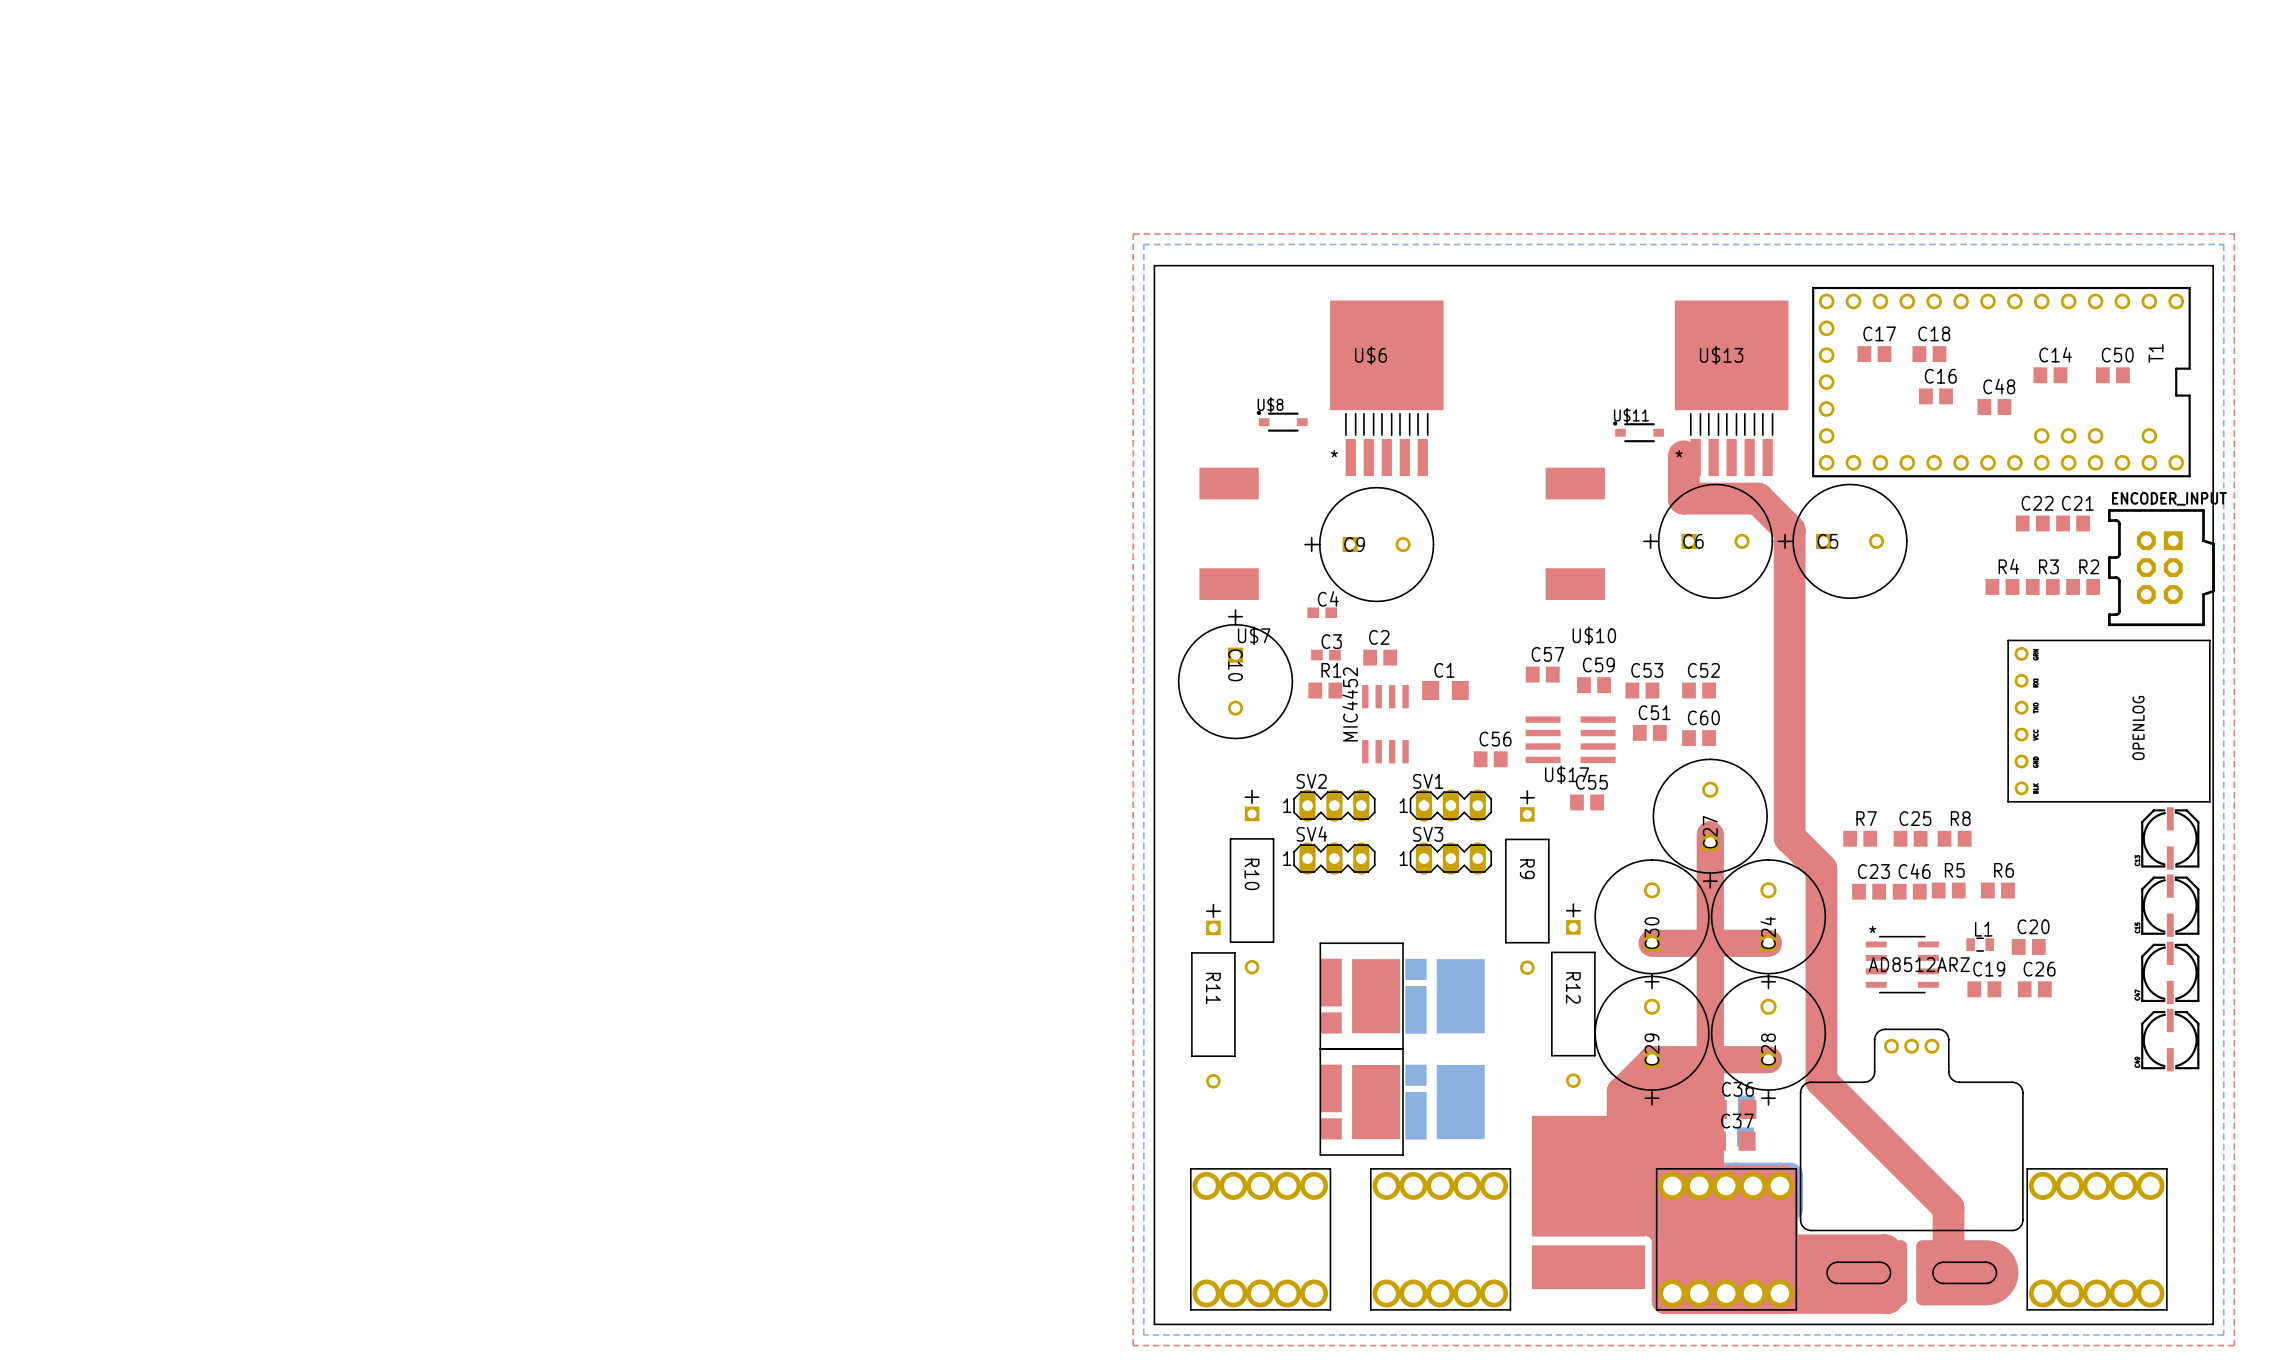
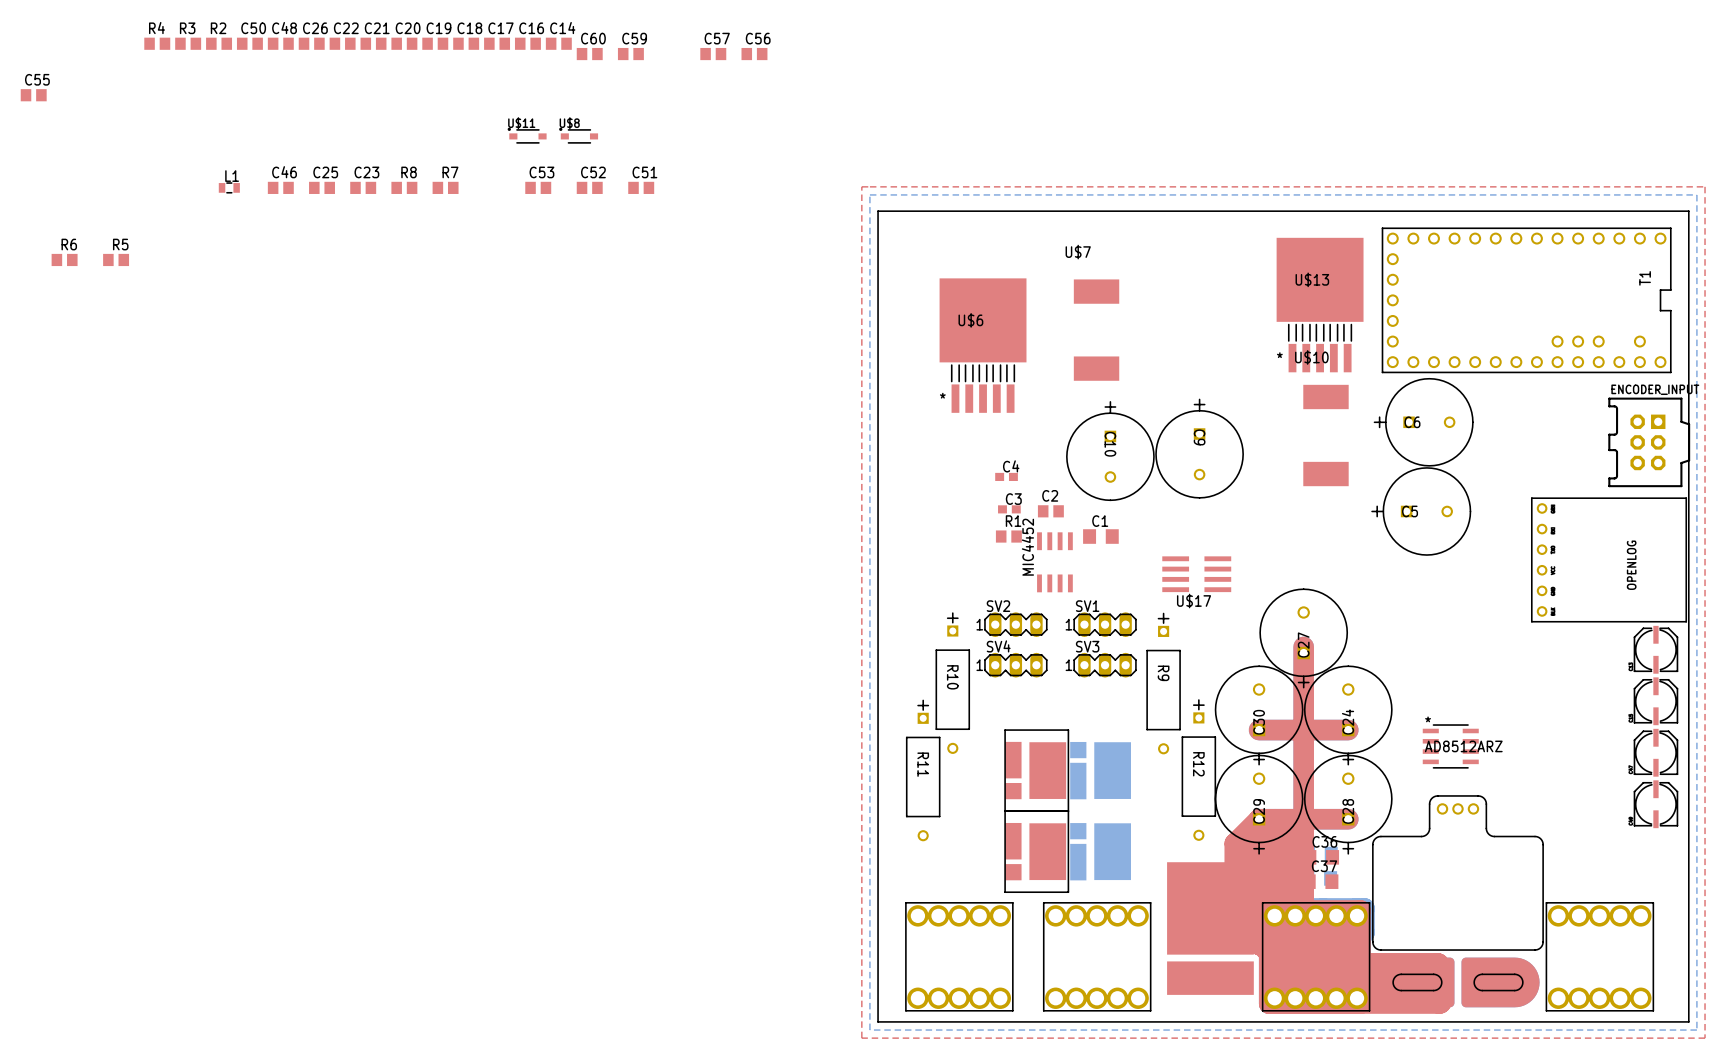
C17 position: (1874, 354) -> (497, 43)
C18 position: (1929, 354) -> (466, 43)
C14 position: (2050, 375) -> (558, 43)
C50 position: (2112, 375) -> (249, 43)
U$6 position: (1386, 388) -> (983, 345)
C16 position: (1935, 396) -> (527, 43)
C48 position: (1994, 407) -> (280, 43)
U$8 position: (1282, 421) -> (578, 135)
U$11 position: (1638, 431) -> (527, 135)
top track: (1683, 456) (1683, 498) (1757, 498) (1789, 530) (1789, 837) (1821, 869) (1821, 1080) (1948, 1207) (1948, 1271) -> none
C22 position: (2032, 523) -> (342, 43)
C21 position: (2073, 523) -> (373, 43)
U$7 position: (1229, 533) -> (1096, 330)
U$10 position: (1575, 533) -> (1325, 435)
C6 position: (1708, 541) -> (1423, 422)
C5 position: (1842, 541) -> (1421, 511)
C9 rotation: 0° (1369, 544) -> 90° clockwise (1199, 448)
C9 position: (1369, 544) -> (1199, 448)
R4 name position: R4 (2008, 566) -> R4 (156, 28)
R3 name position: R3 (2048, 566) -> R3 (187, 28)
R2 name position: R2 (2089, 566) -> R2 (218, 28)
R4 position: (2002, 586) -> (157, 43)
R3 position: (2042, 586) -> (188, 43)
R2 position: (2083, 586) -> (219, 43)
U$7 name position: U$7 (1254, 635) -> U$7 (1078, 252)
U$10 name position: U$10 (1594, 635) -> U$10 (1311, 357)
C10 position: (1235, 674) -> (1110, 451)
C57 position: (1542, 674) -> (713, 54)
C59 position: (1594, 685) -> (630, 54)
C53 position: (1642, 690) -> (538, 187)
C52 position: (1699, 690) -> (589, 187)
C51 position: (1649, 732) -> (641, 187)
C60 position: (1699, 738) -> (589, 54)
C56 position: (1490, 759) -> (754, 54)
C55 position: (1587, 802) -> (33, 95)
R7 position: (1860, 838) -> (445, 187)
C25 position: (1910, 838) -> (322, 187)
R8 position: (1954, 838) -> (404, 187)
R5 position: (1948, 890) -> (116, 259)
R6 position: (1997, 890) -> (64, 259)
C23 position: (1869, 891) -> (363, 187)
C46 position: (1909, 891) -> (280, 187)
L1 position: (1980, 944) -> (229, 187)
C20 position: (2028, 946) -> (404, 43)
C19 position: (1984, 989) -> (435, 43)
C26 position: (2034, 989) -> (311, 43)

